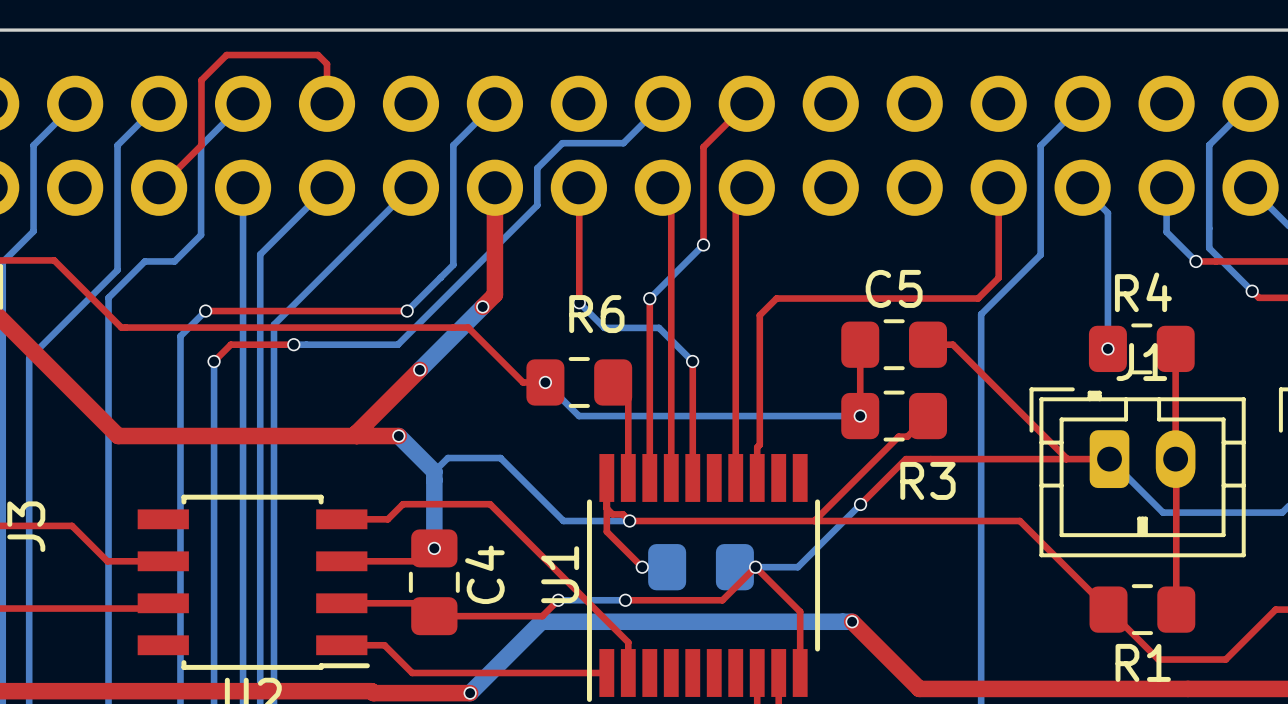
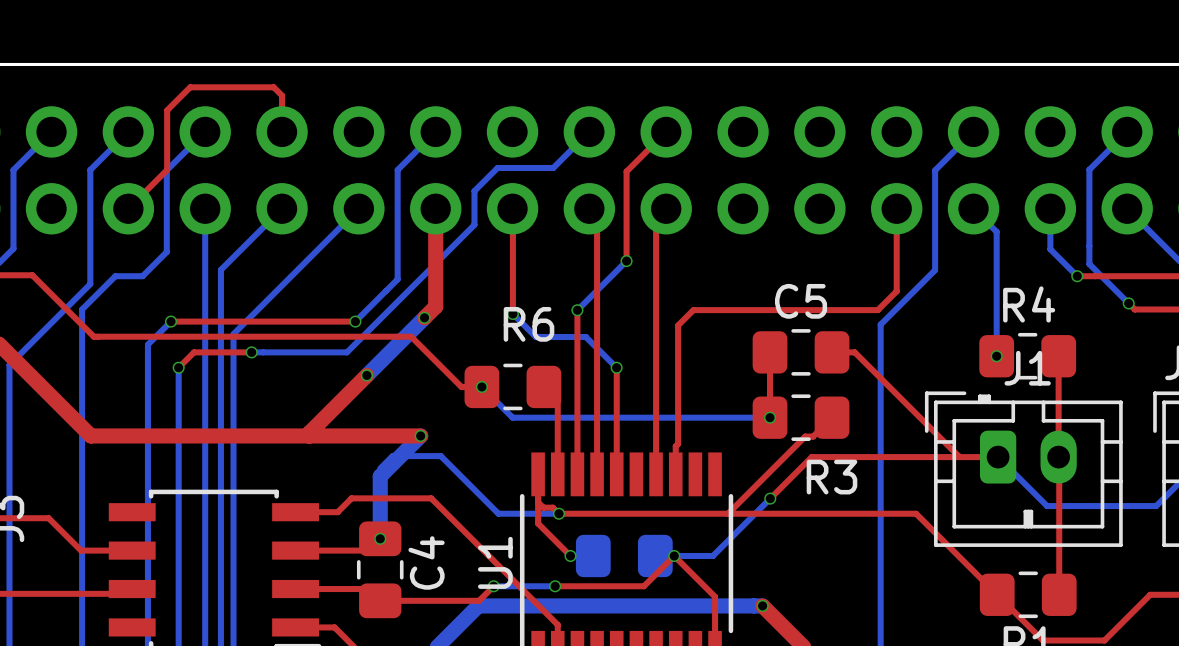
bottom track: (398, 436) (434, 471) (434, 480) -> (420, 435) (380, 476)
top track: none -> (347, 435) (420, 435)
via position: (398, 436) -> (420, 435)

